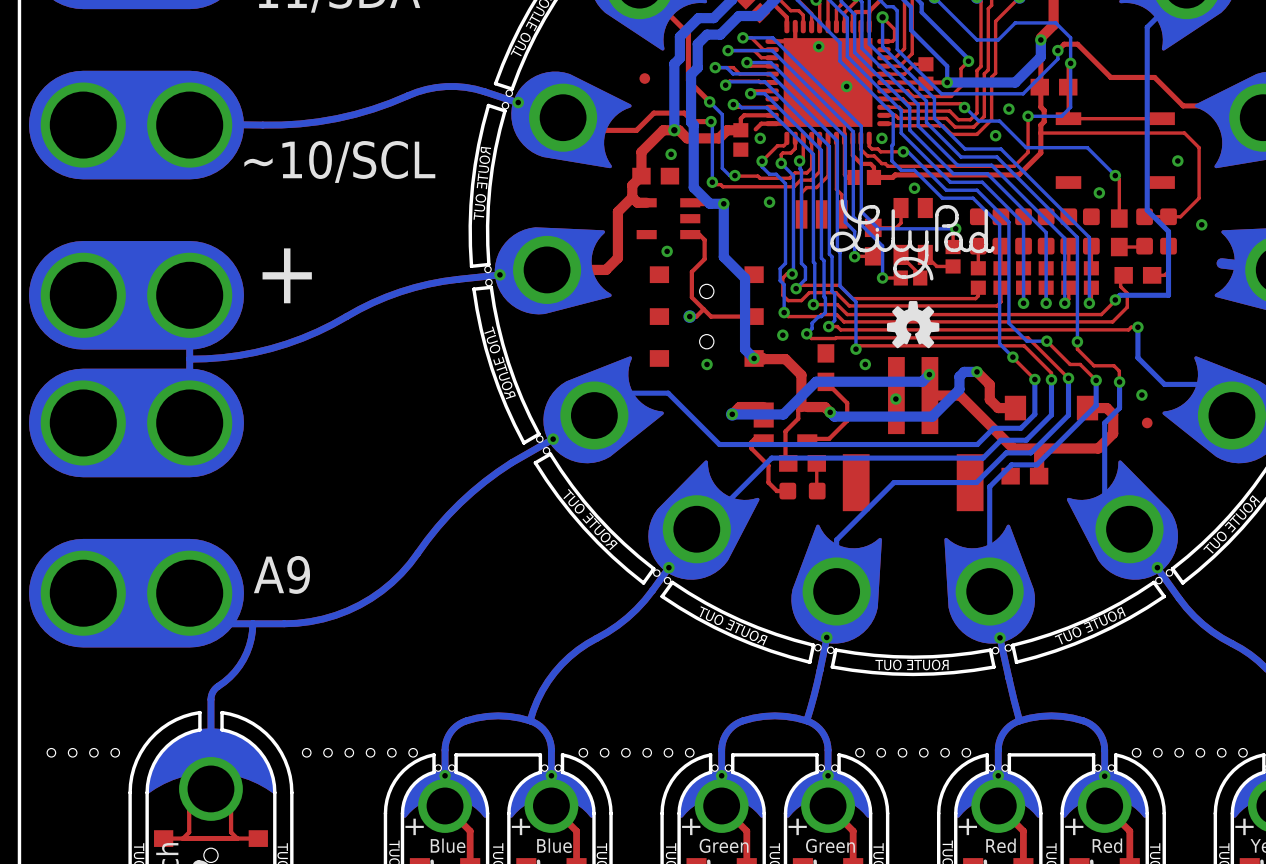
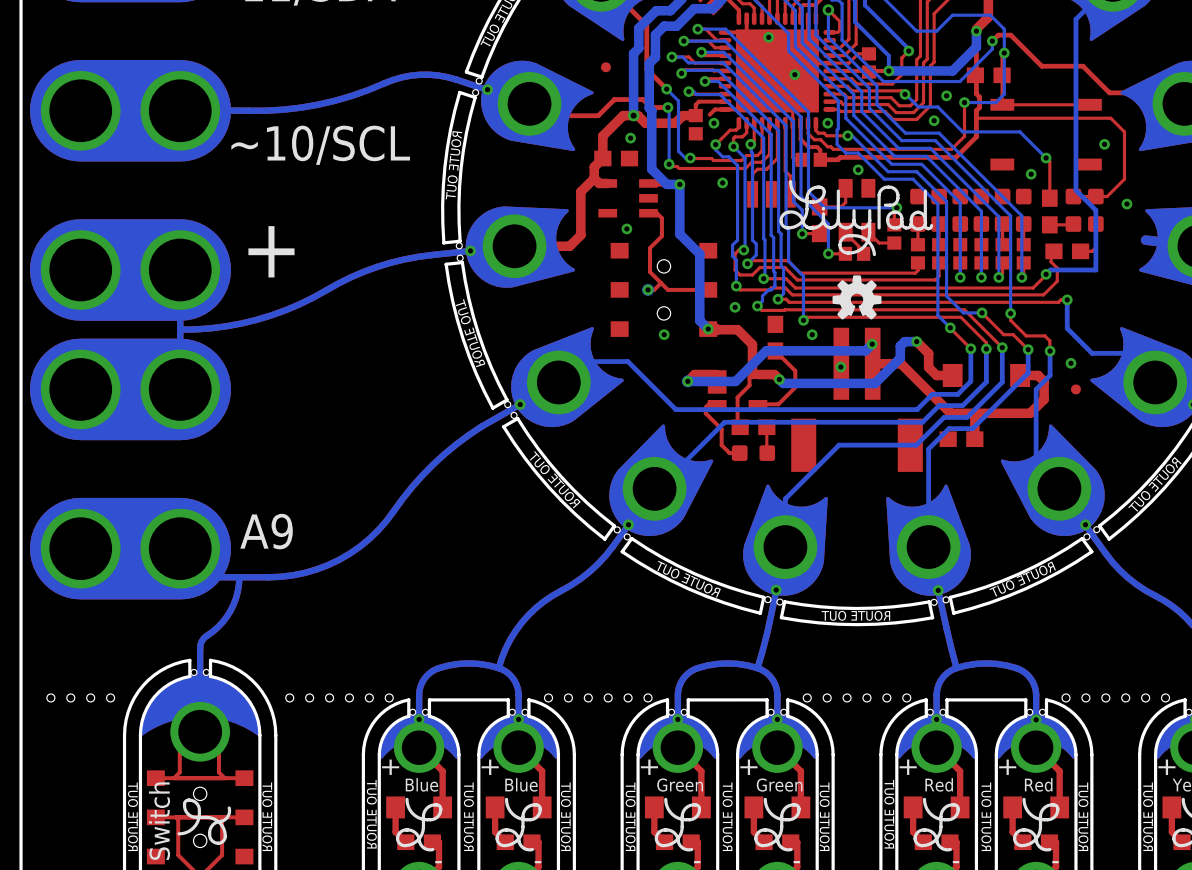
hole: none -> (193, 672)
hole: none -> (206, 672)

